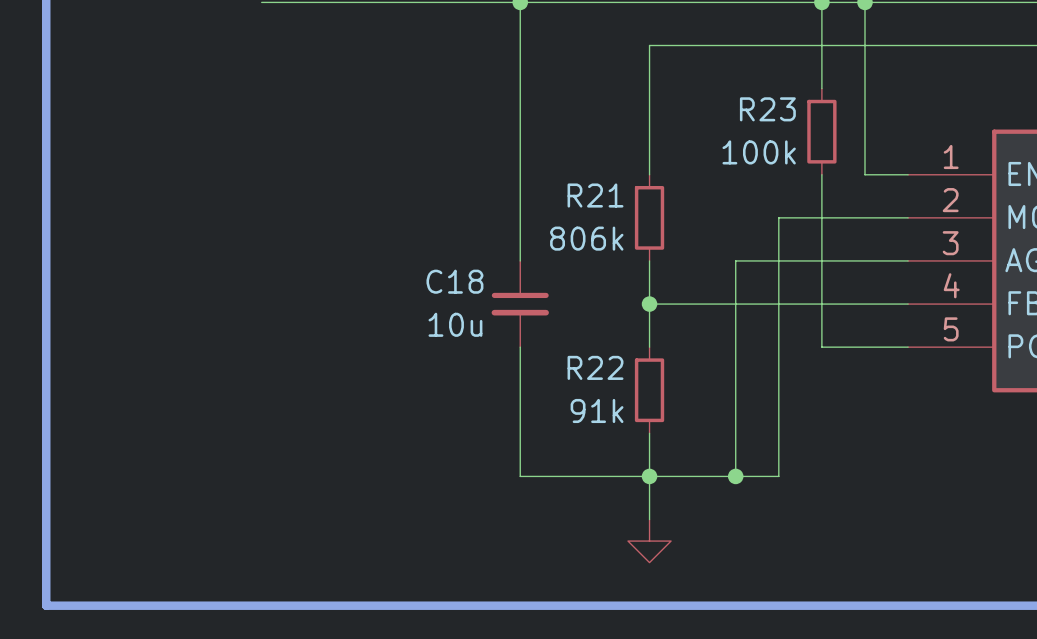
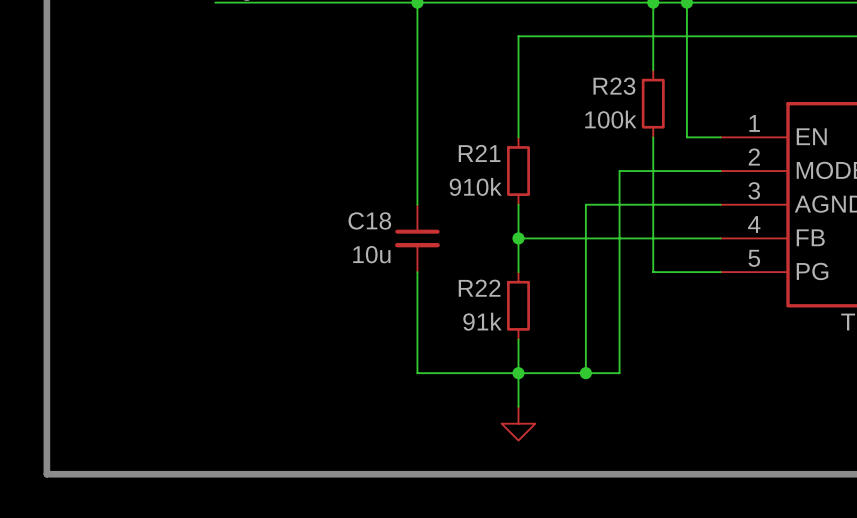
R21 value: 806k (586, 238) -> 910k (475, 186)

